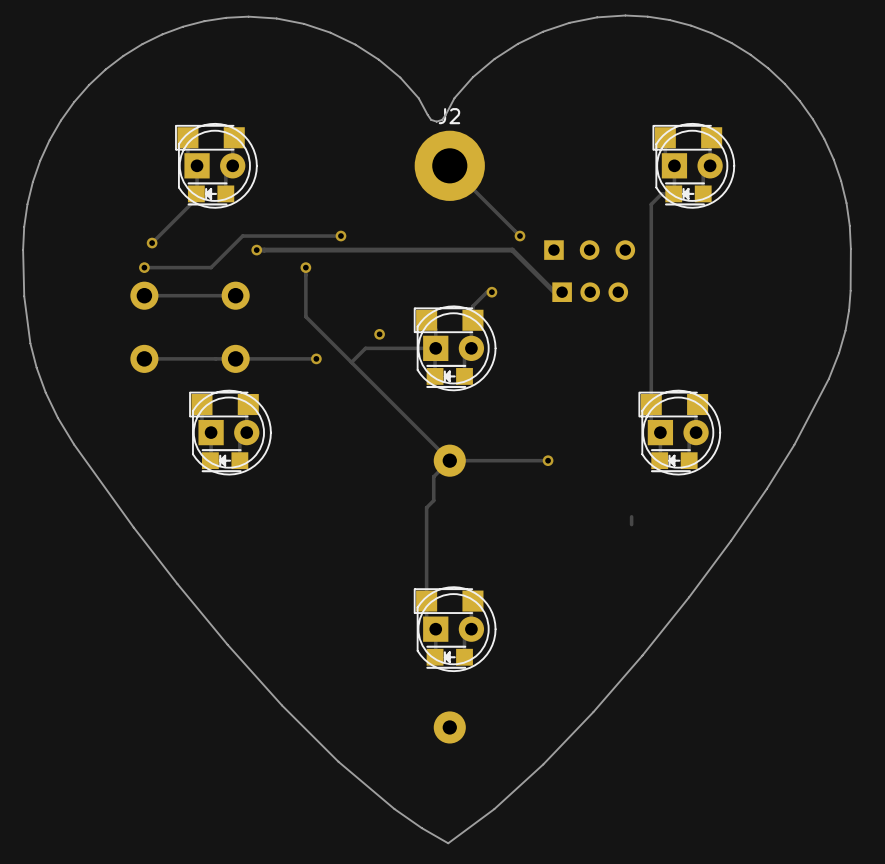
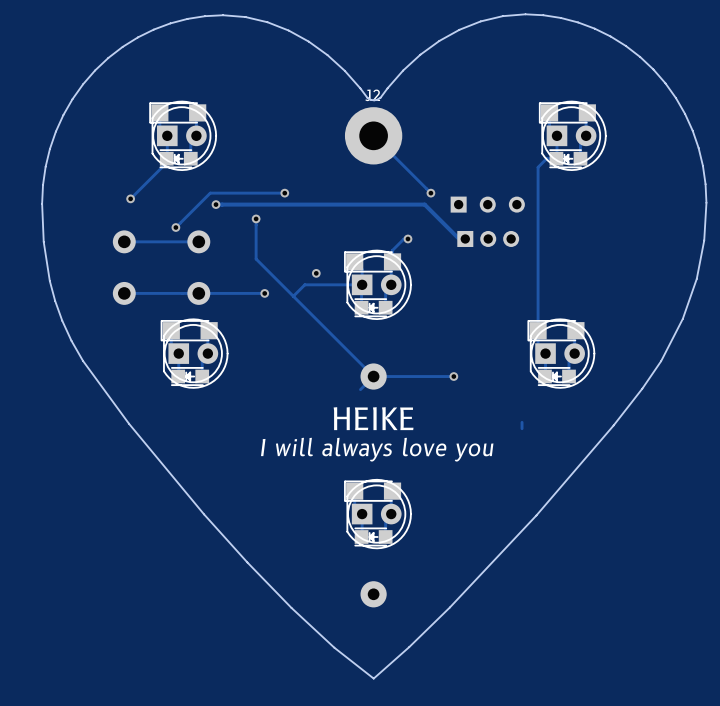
board edge: (625, 15) (669, 20) (691, 25) (731, 42) (768, 68) (784, 83) (813, 119) (833, 159) (846, 203) (850, 248) (850, 290) (845, 330) (828, 378) (794, 444) (731, 540) (689, 597) (593, 712) (543, 764) (494, 809) (448, 843) (394, 809) (338, 761) (282, 705) (227, 644) (177, 583) (133, 527) (74, 444) (45, 392) (30, 343) (24, 296) (23, 249) (27, 204) (32, 182) (49, 140) (74, 102) (89, 84) (123, 55) (142, 44) (182, 26) (226, 17) (248, 16) (276, 18) (304, 23) (330, 32) (355, 44) (378, 59) (400, 77) (418, 98) (431, 119) (436, 121) (442, 119) (454, 98) (472, 77) (494, 59) (518, 43) (543, 31) (569, 22) (597, 17) (625, 15) -> (525, 14) (502, 16) (480, 21) (439, 40) (420, 54) (403, 70) (380, 97) (374, 100) (367, 97) (344, 70) (327, 55) (288, 30) (267, 22) (245, 17) (223, 15) (205, 16) (170, 23) (137, 37) (122, 46) (95, 70) (83, 84) (63, 114) (49, 148) (45, 166) (42, 203) (43, 241) (49, 281) (62, 320) (83, 361) (128, 423) (204, 514) (247, 562) (291, 607) (334, 647) (373, 678) (449, 607) (536, 515) (613, 425) (661, 361) (682, 318) (696, 278) (704, 240) (705, 184) (698, 147) (685, 114) (676, 98) (653, 69) (640, 57) (610, 36) (578, 22) (560, 17) (525, 14)
track: (249, 236) (242, 236) (211, 267) (144, 267) -> (210, 193) (175, 227)
via position: (144, 267) -> (175, 227)
track: (433, 476) (433, 500) (426, 507) (426, 601) -> none
text: none -> HEIKE (373, 418)
text: none -> I will always love you (377, 449)

